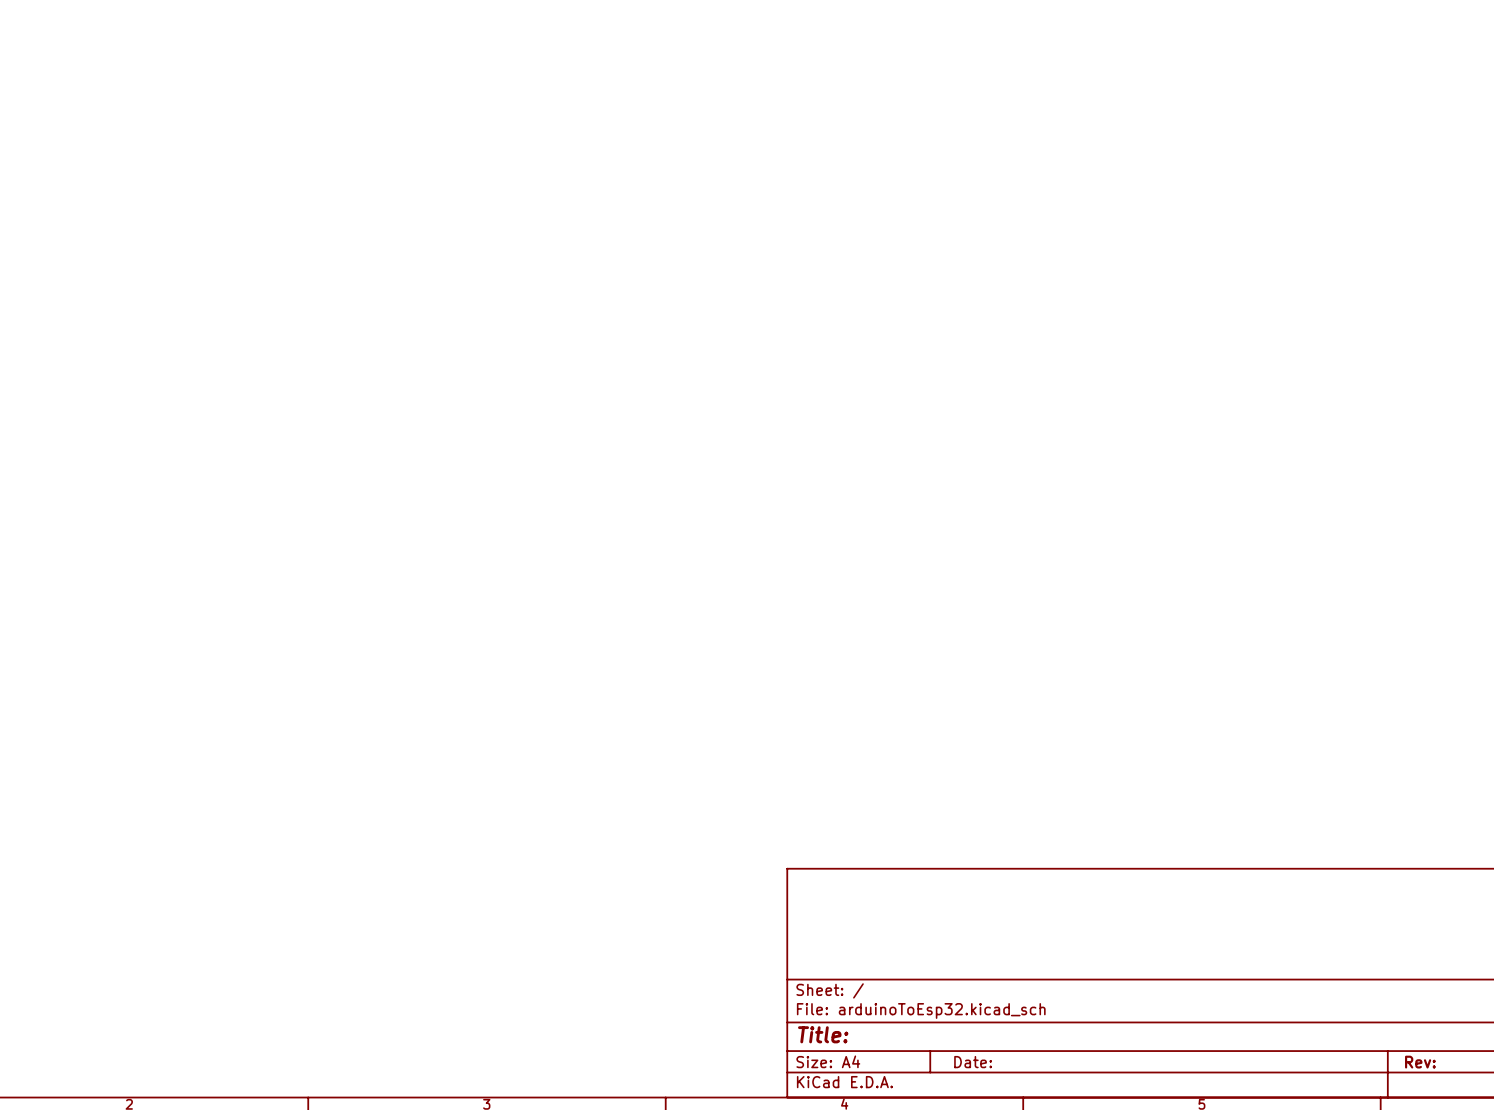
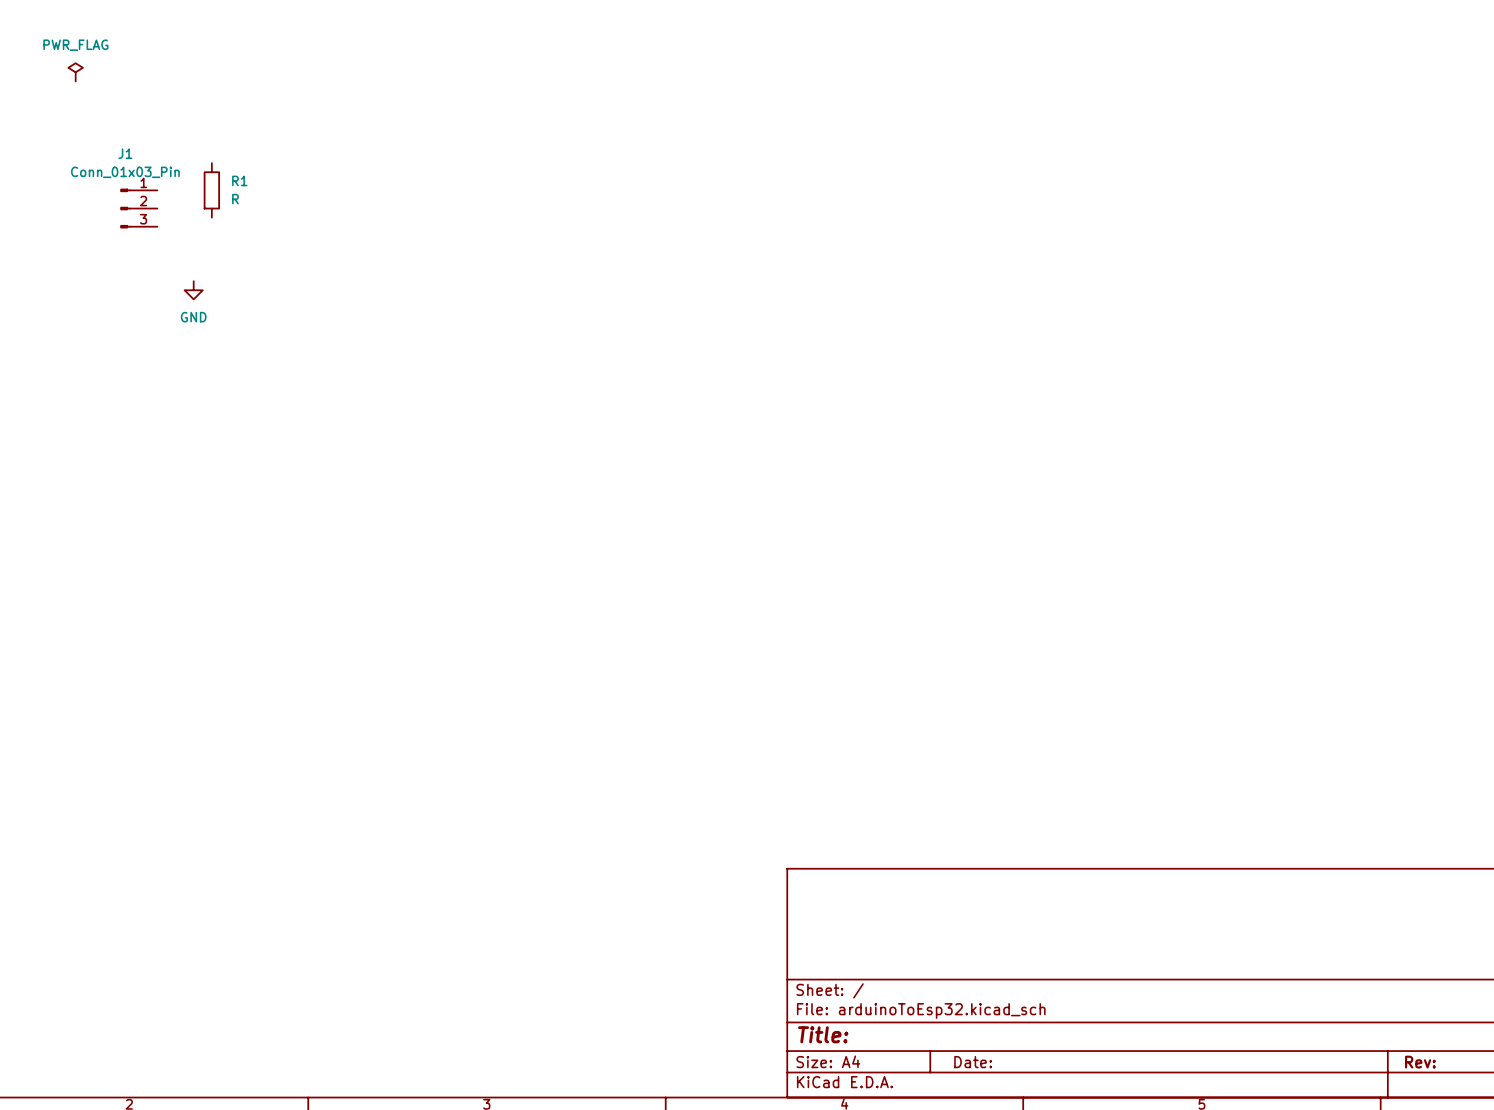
power symbol: none -> PWR_FLAG (75, 72)
R1: none -> R (211, 190)
J1: none -> Conn_01x03_Pin (138, 208)
power symbol: none -> GND (193, 290)

